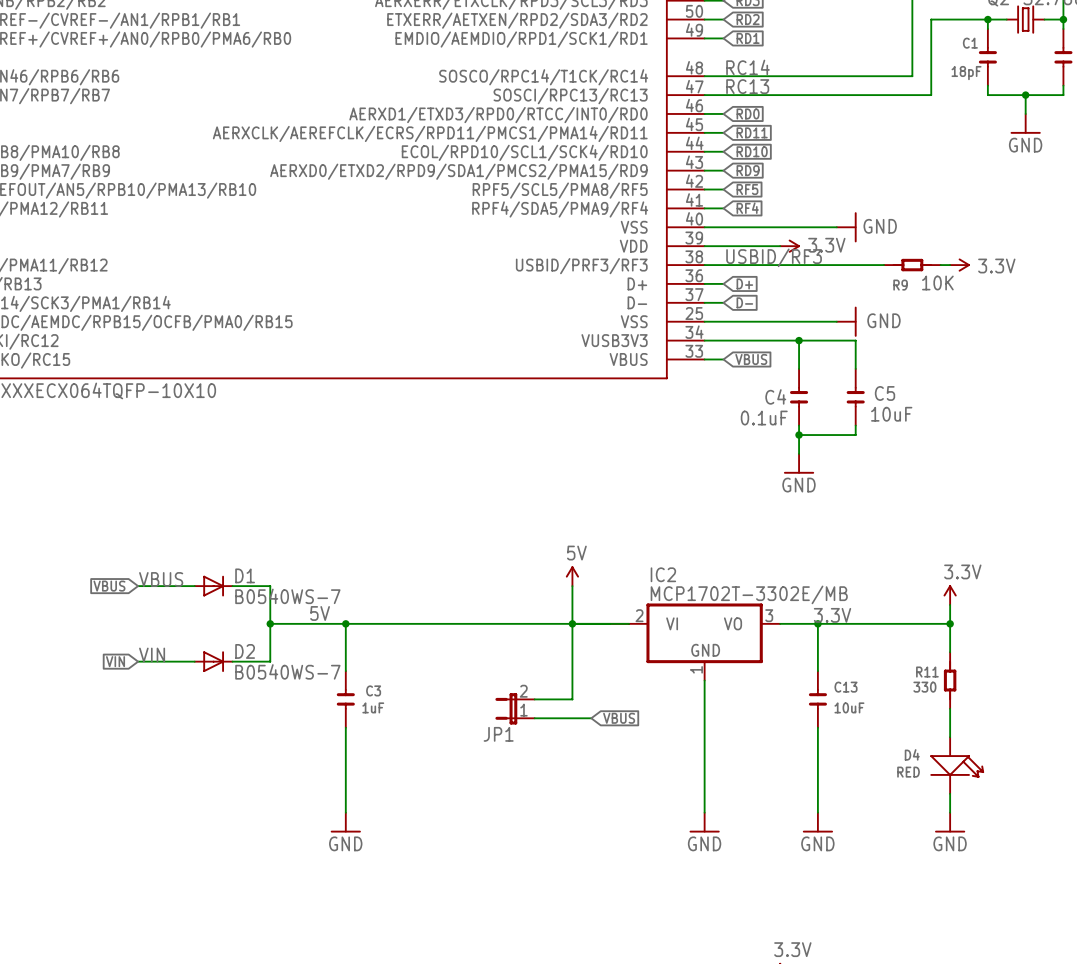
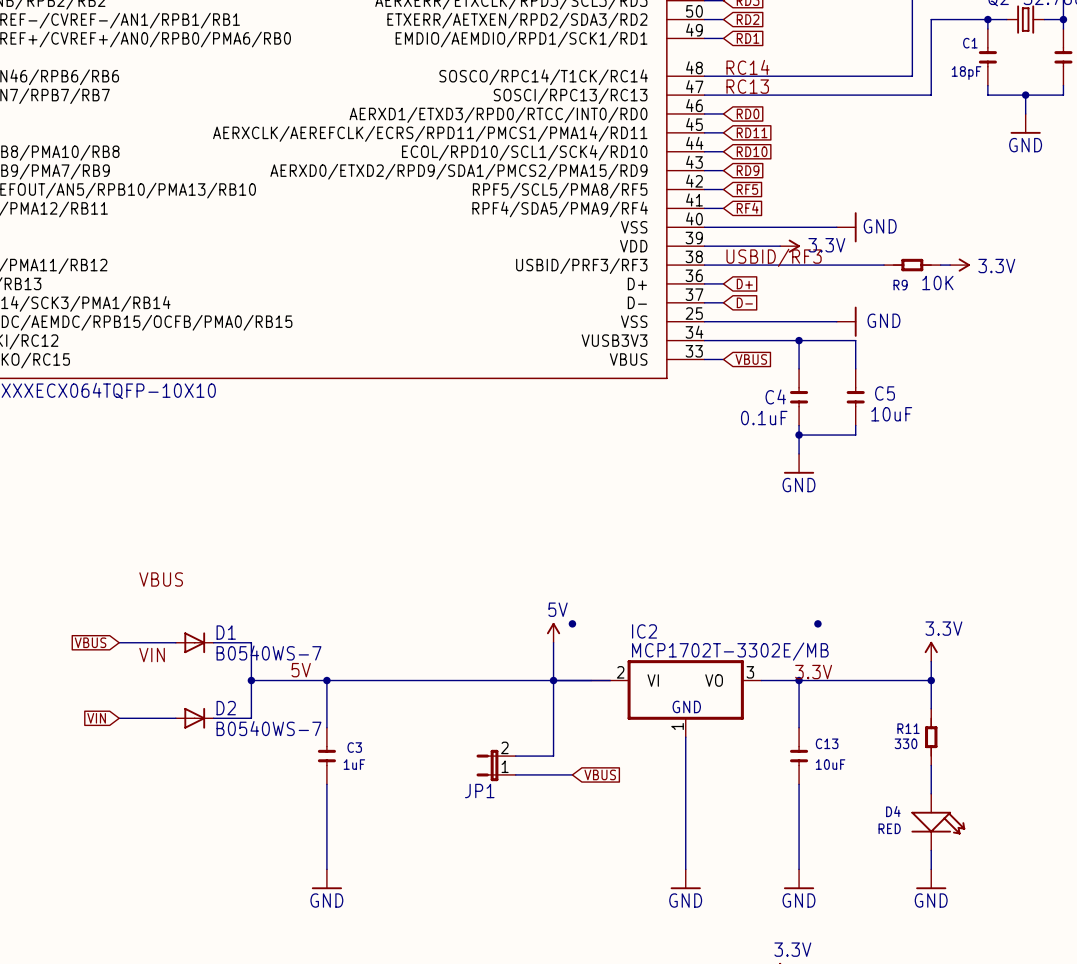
power symbol position: 5V (572, 576) -> 5V (553, 632)
global label position: VBUS (109, 586) -> VBUS (90, 642)
wire: (138, 586) (194, 586) -> (119, 642) (175, 642)
D1 position: (213, 586) -> (194, 642)
wire: (232, 586) (270, 586) (270, 661) (232, 661) -> (213, 642) (251, 642) (251, 718) (213, 718)
wire: (572, 586) (572, 699) (534, 699) -> (553, 642) (553, 756) (515, 756)
power symbol position: 3.3V (950, 595) -> 3.3V (931, 651)
wire: (950, 604) (950, 652) -> (931, 661) (931, 708)
label position: 5V (320, 613) -> 5V (301, 670)
label position: 3.3V (832, 615) -> 3.3V (813, 672)
wire: (270, 623) (629, 623) -> (251, 680) (610, 680)
junction: (270, 623) -> none
wire: (345, 623) (345, 671) -> (326, 680) (326, 727)
junction: (345, 623) -> none
wire: (780, 623) (950, 623) -> (761, 680) (931, 680)
wire: (817, 623) (817, 671) -> (799, 680) (799, 727)
junction: (950, 623) -> none
IC2 position: (695, 642) -> (676, 698)
global label position: VIN (115, 661) -> VIN (96, 718)
wire: (138, 661) (194, 661) -> (119, 718) (175, 718)
D2 position: (213, 661) -> (194, 718)
junction: none -> (251, 680)
junction: none -> (326, 680)
junction: none -> (553, 680)
wire: (704, 680) (704, 812) -> (685, 737) (685, 869)
junction: none -> (799, 680)
junction: none -> (931, 680)
R11 position: (950, 680) -> (931, 737)
C3 position: (345, 699) -> (326, 756)
C13 position: (817, 699) -> (799, 756)
JP1 position: (515, 708) -> (496, 765)
wire: (950, 708) (950, 737) -> (931, 765) (931, 793)
wire: (534, 718) (591, 718) -> (515, 774) (572, 774)
global label position: VBUS (619, 718) -> VBUS (600, 774)
wire: (345, 727) (345, 812) -> (326, 784) (326, 869)
wire: (817, 727) (817, 812) -> (799, 784) (799, 869)
D4 position: (957, 765) -> (938, 822)
wire: (950, 793) (950, 812) -> (931, 850) (931, 869)
power symbol position: GND (345, 822) -> GND (326, 879)
power symbol: GND (704, 822) -> none
power symbol: GND (817, 822) -> none
power symbol position: GND (950, 822) -> GND (931, 879)
power symbol: none -> GND (685, 879)
power symbol: none -> GND (799, 879)

